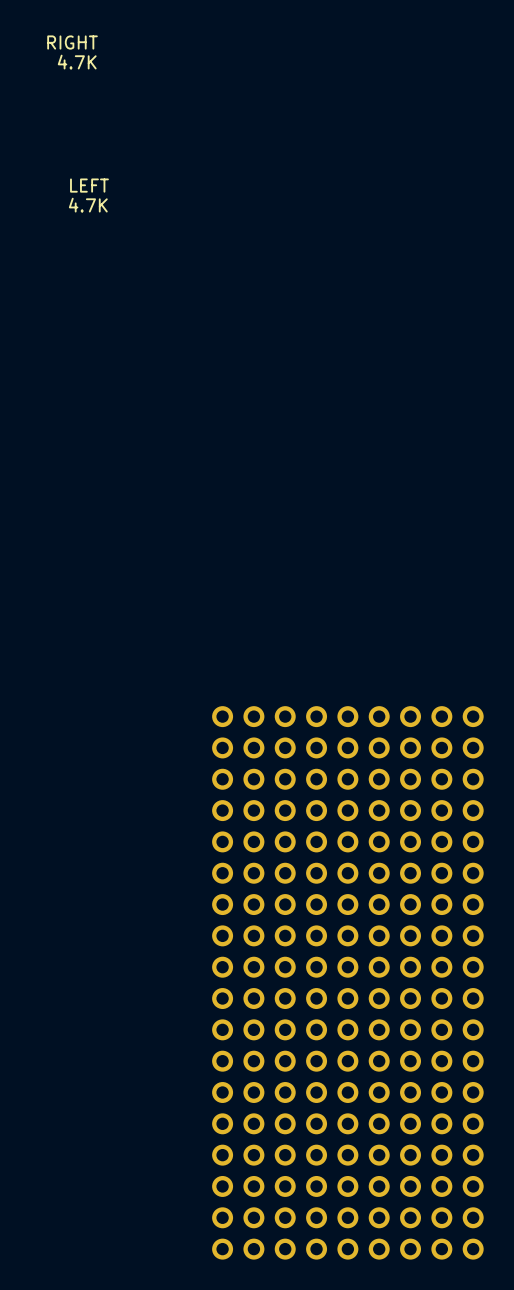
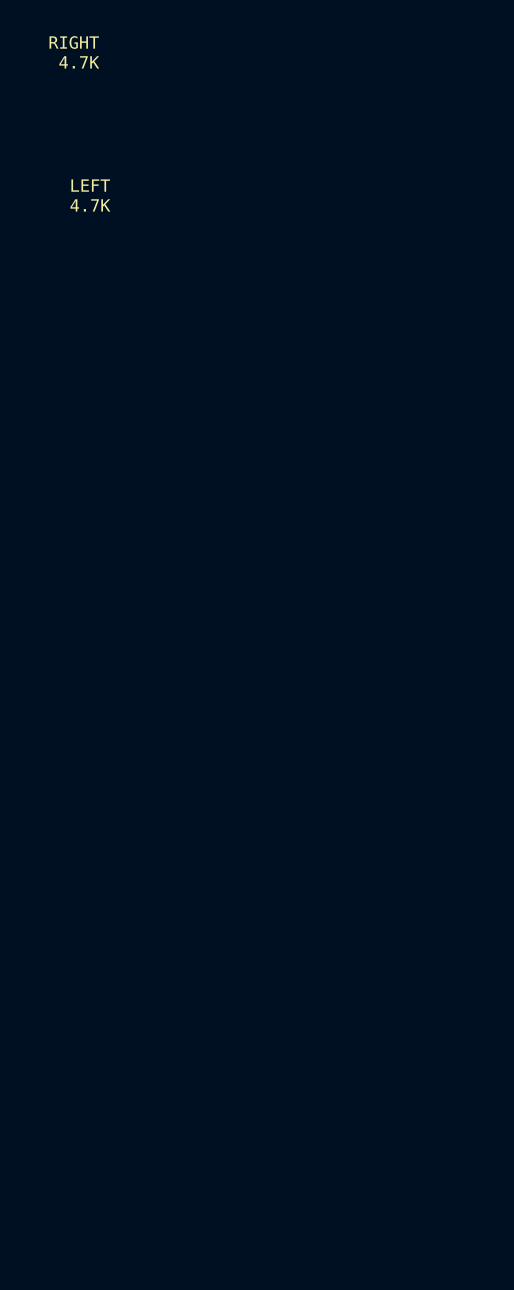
part: (222, 982) -> none
part: (253, 982) -> none
part: (285, 982) -> none
part: (316, 982) -> none
part: (347, 982) -> none
part: (379, 982) -> none
part: (410, 982) -> none
part: (441, 982) -> none
part: (473, 982) -> none

